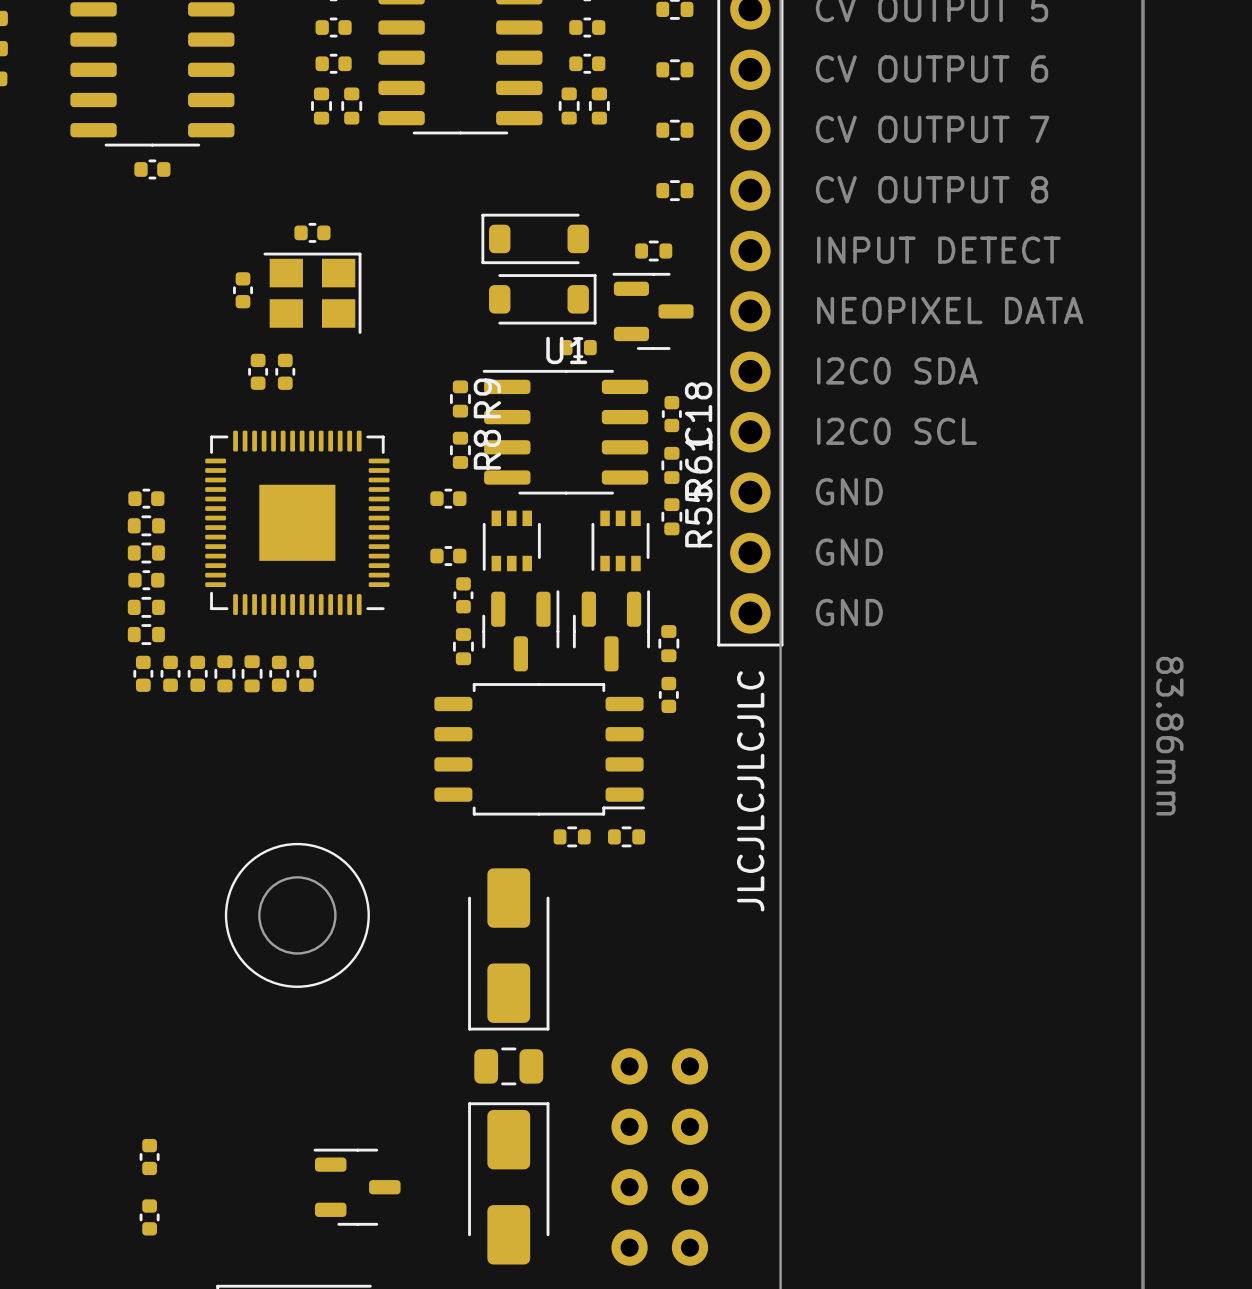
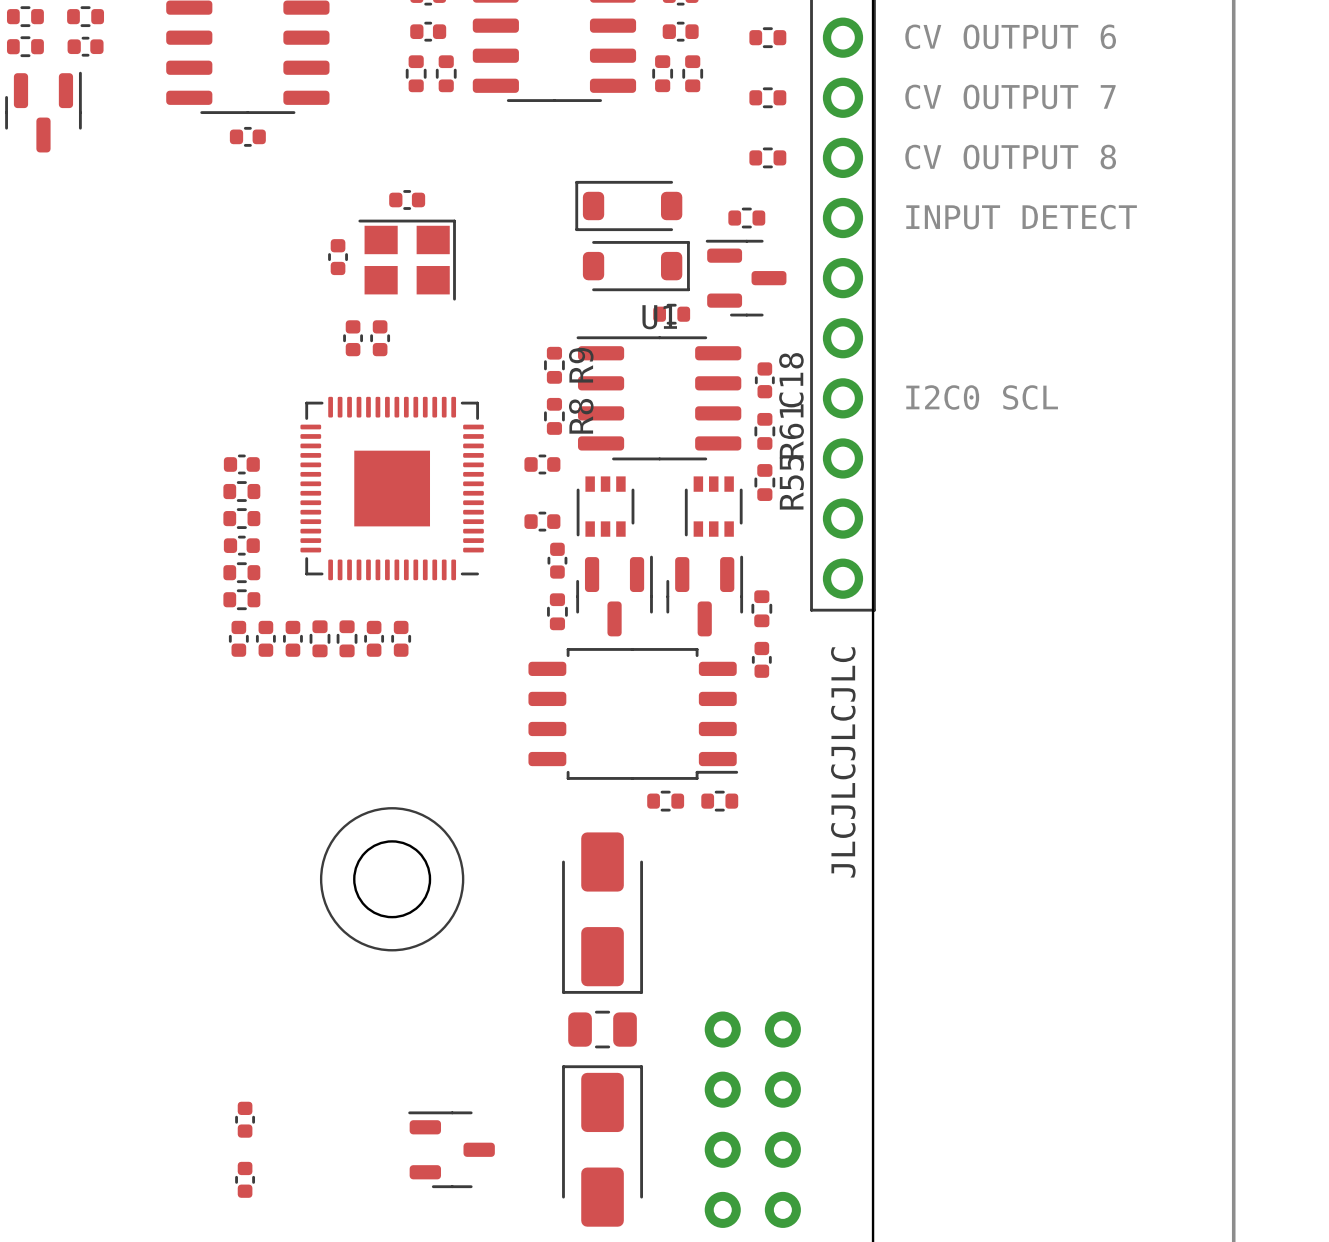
text: NEOPIXEL DATA (950, 310) -> none
text: I2C0 SDA (897, 370) -> none
text: GND (849, 491) -> none
text: GND (849, 552) -> none
text: GND (849, 612) -> none
text: 83.86mm (1169, 736) -> none

